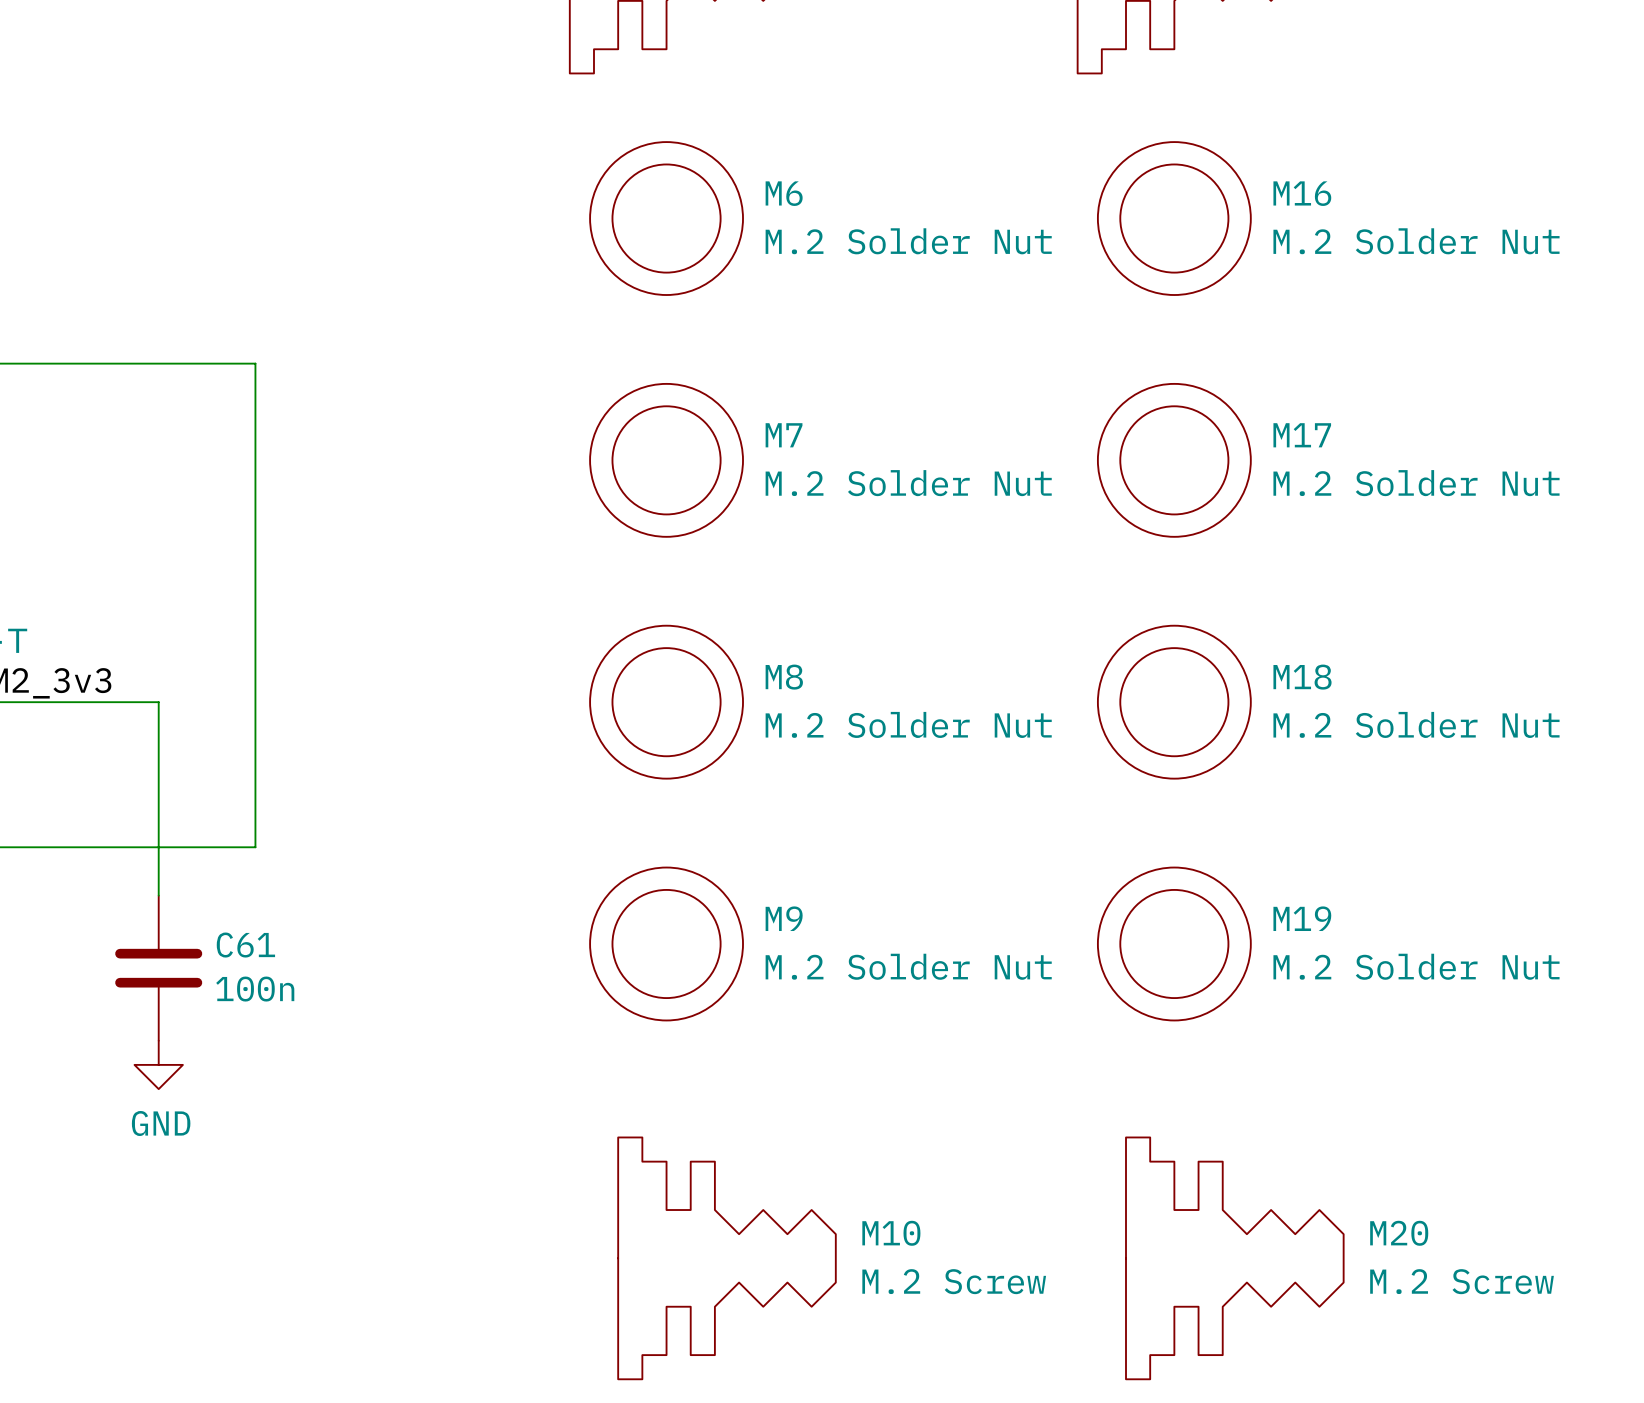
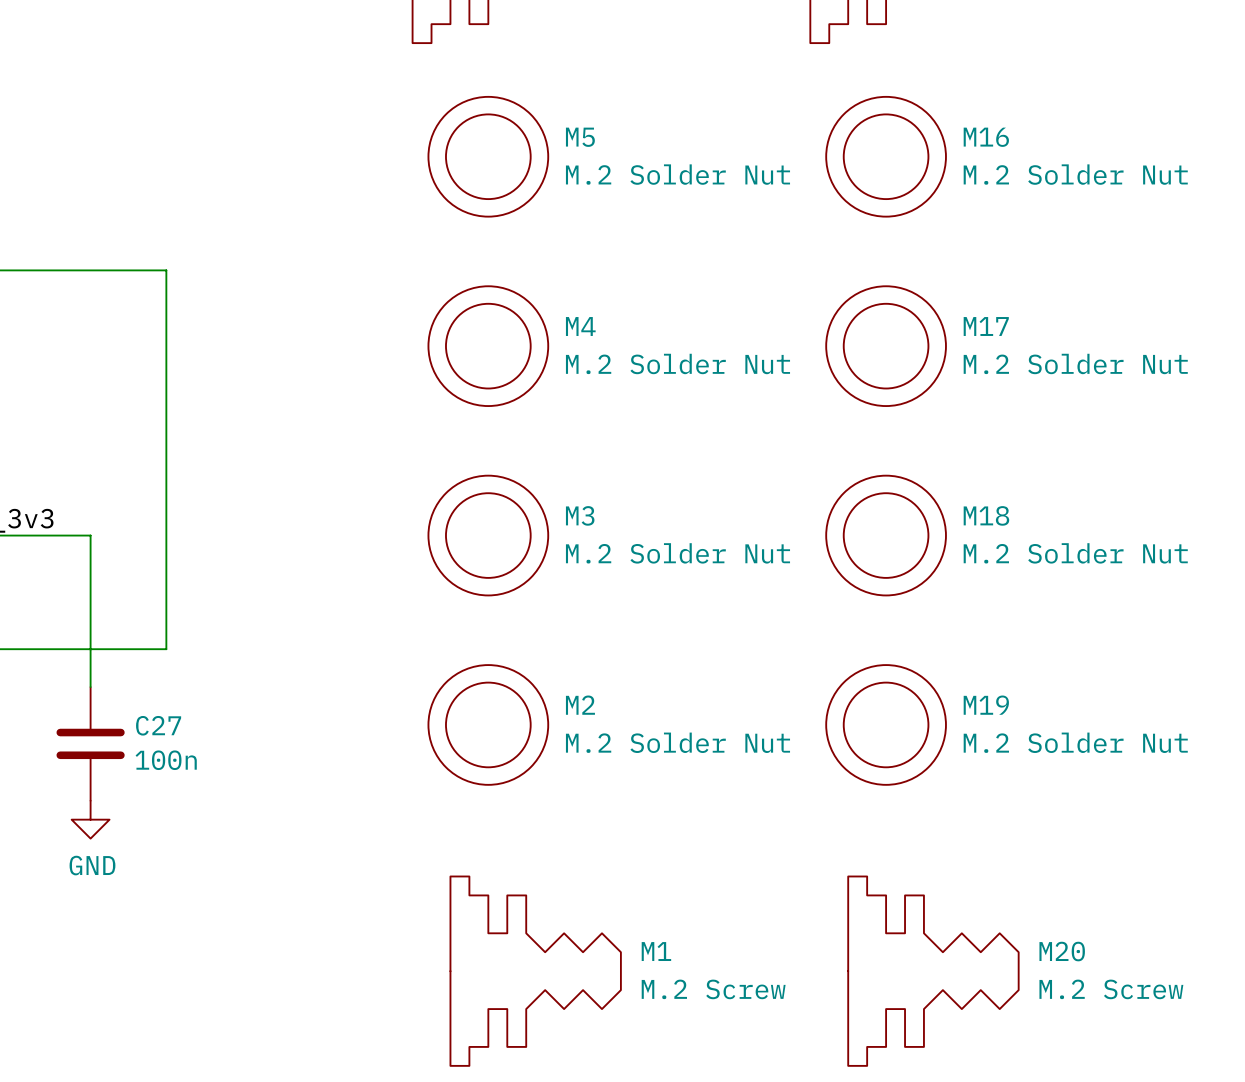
M6 name: M6 (784, 193) -> M5 (580, 137)
M7 name: M7 (784, 435) -> M4 (580, 326)
M8 name: M8 (784, 677) -> M3 (580, 515)
M9 name: M9 (784, 918) -> M2 (580, 705)
C61 name: C61 (245, 945) -> C27 (158, 725)
M10 name: M10 (891, 1233) -> M1 (656, 951)

